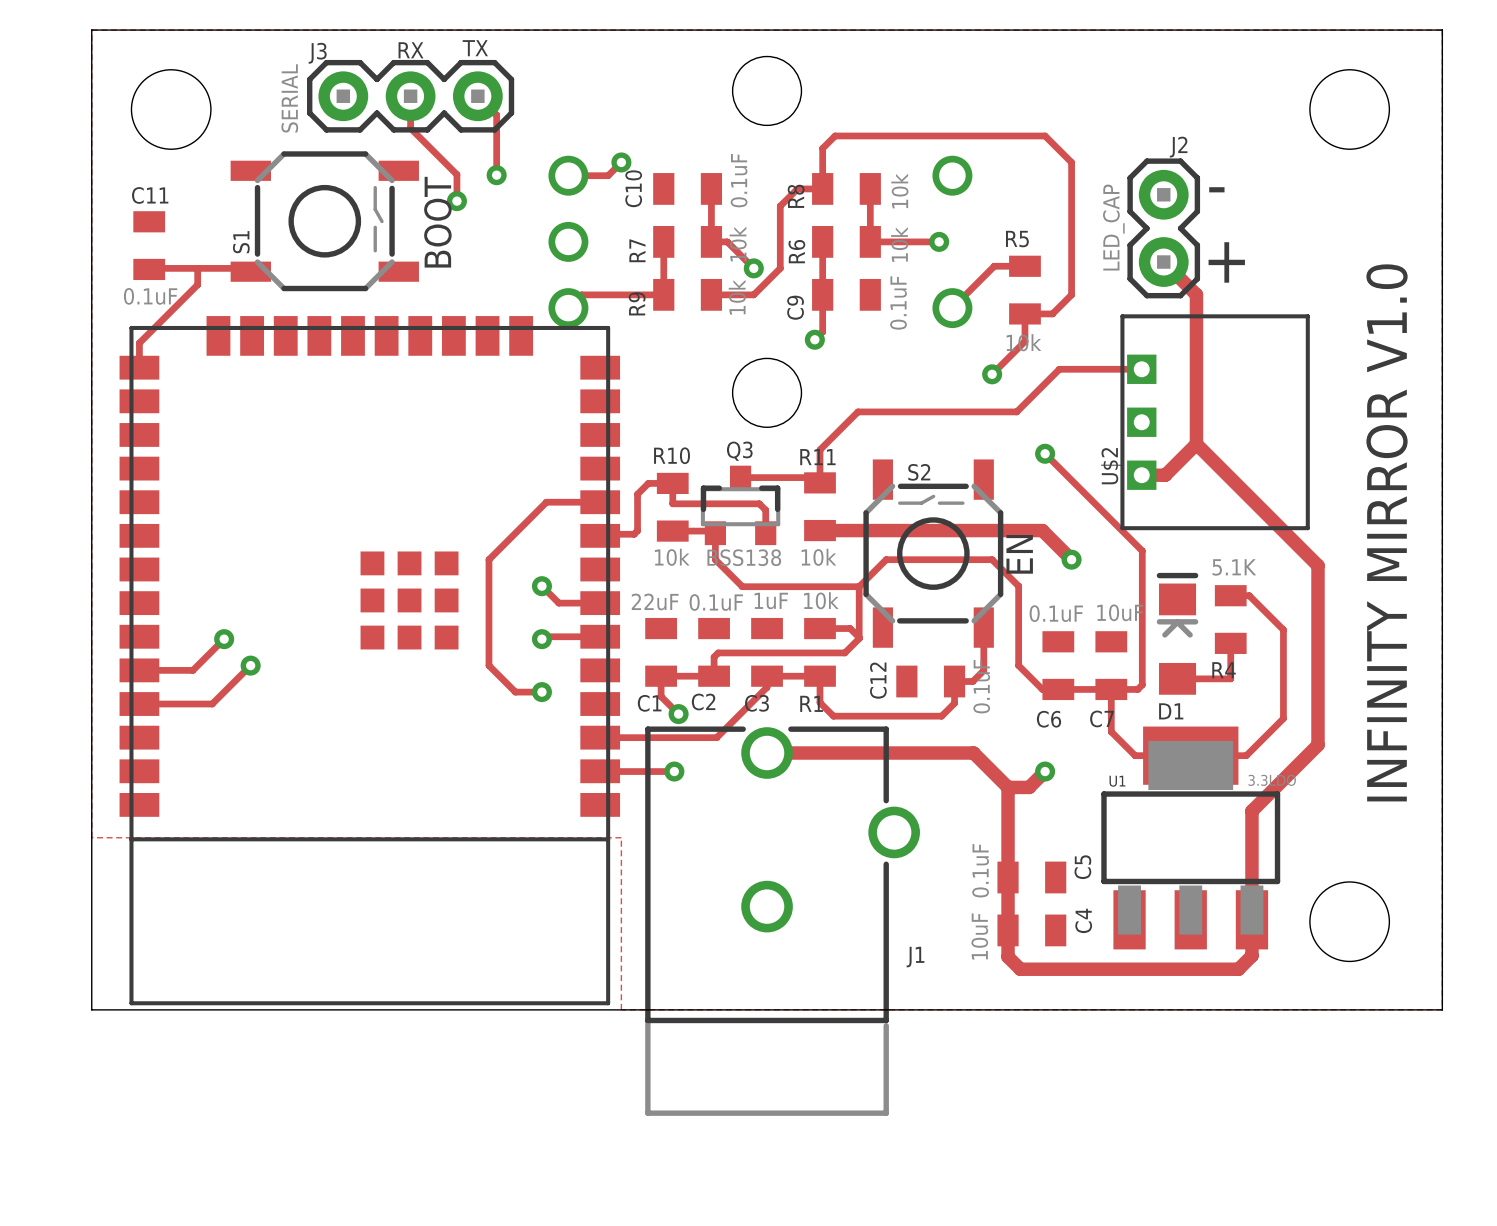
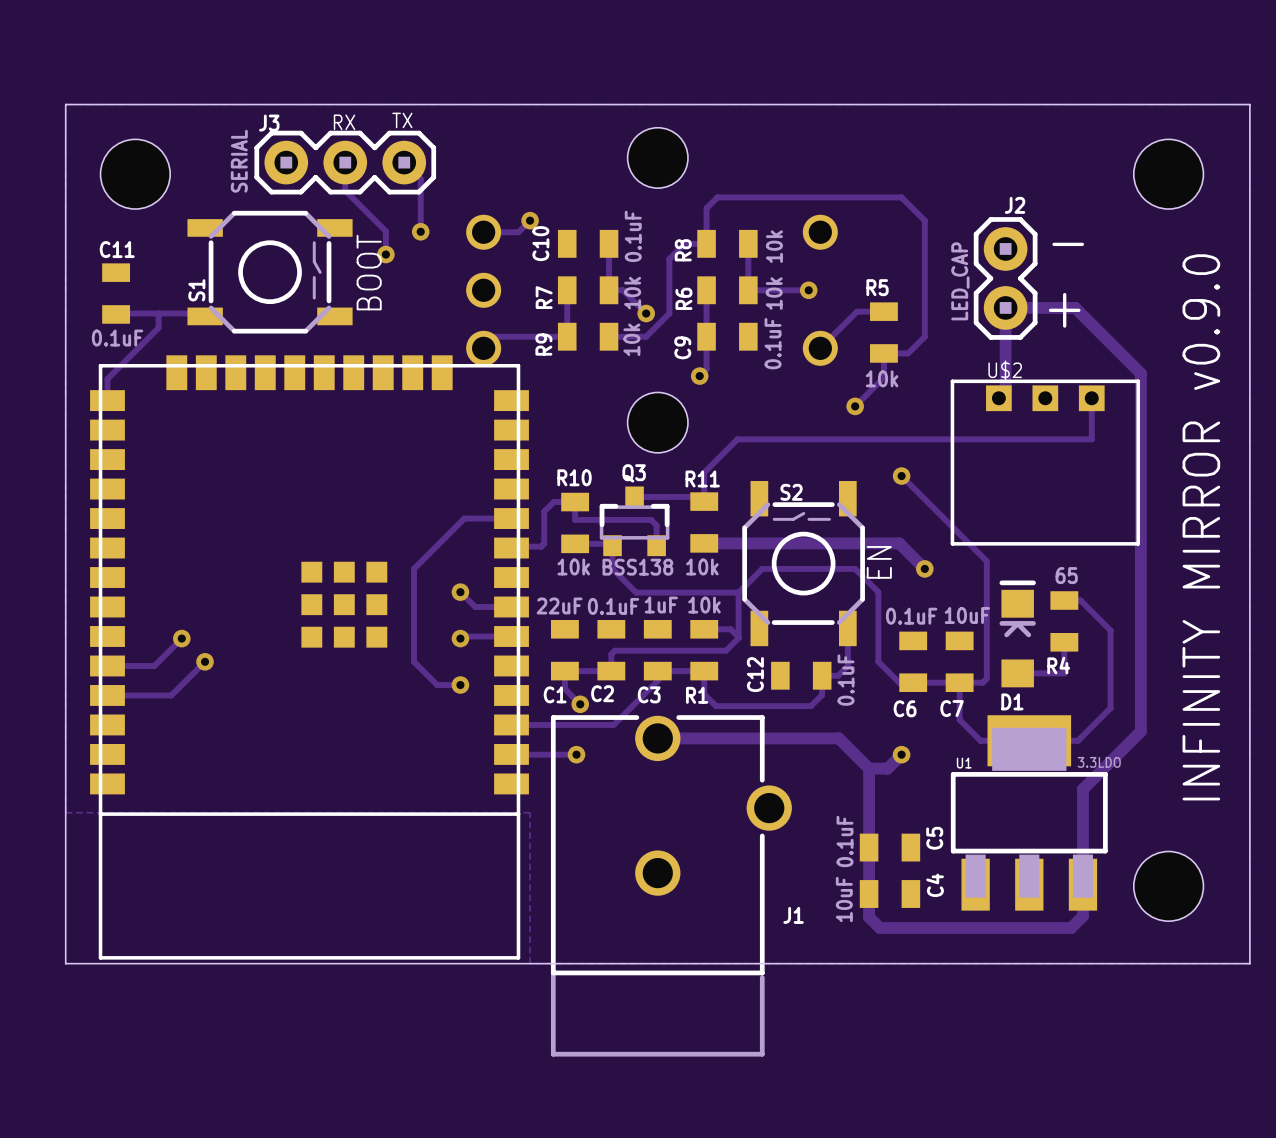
track: (1163, 262) (1196, 294) (1196, 444) -> none
track: (1141, 369) (1059, 369) (1016, 411) -> (1091, 398) (1091, 439) (876, 439)
U$2 rotation: 0° (1215, 422) -> 90° clockwise (1045, 462)
track: (1196, 444) (1317, 565) -> (998, 398) (1005, 391) (1005, 307) (1075, 307) (1140, 373) (1140, 574)
track: (1196, 444) (1165, 475) (1141, 475) -> none
text: INFINITY MIRROR V1.0 (1387, 532) -> INFINITY MIRROR v0.9.0 (1201, 527)
R4 value: 5.1K (1234, 567) -> 65 (1066, 575)

